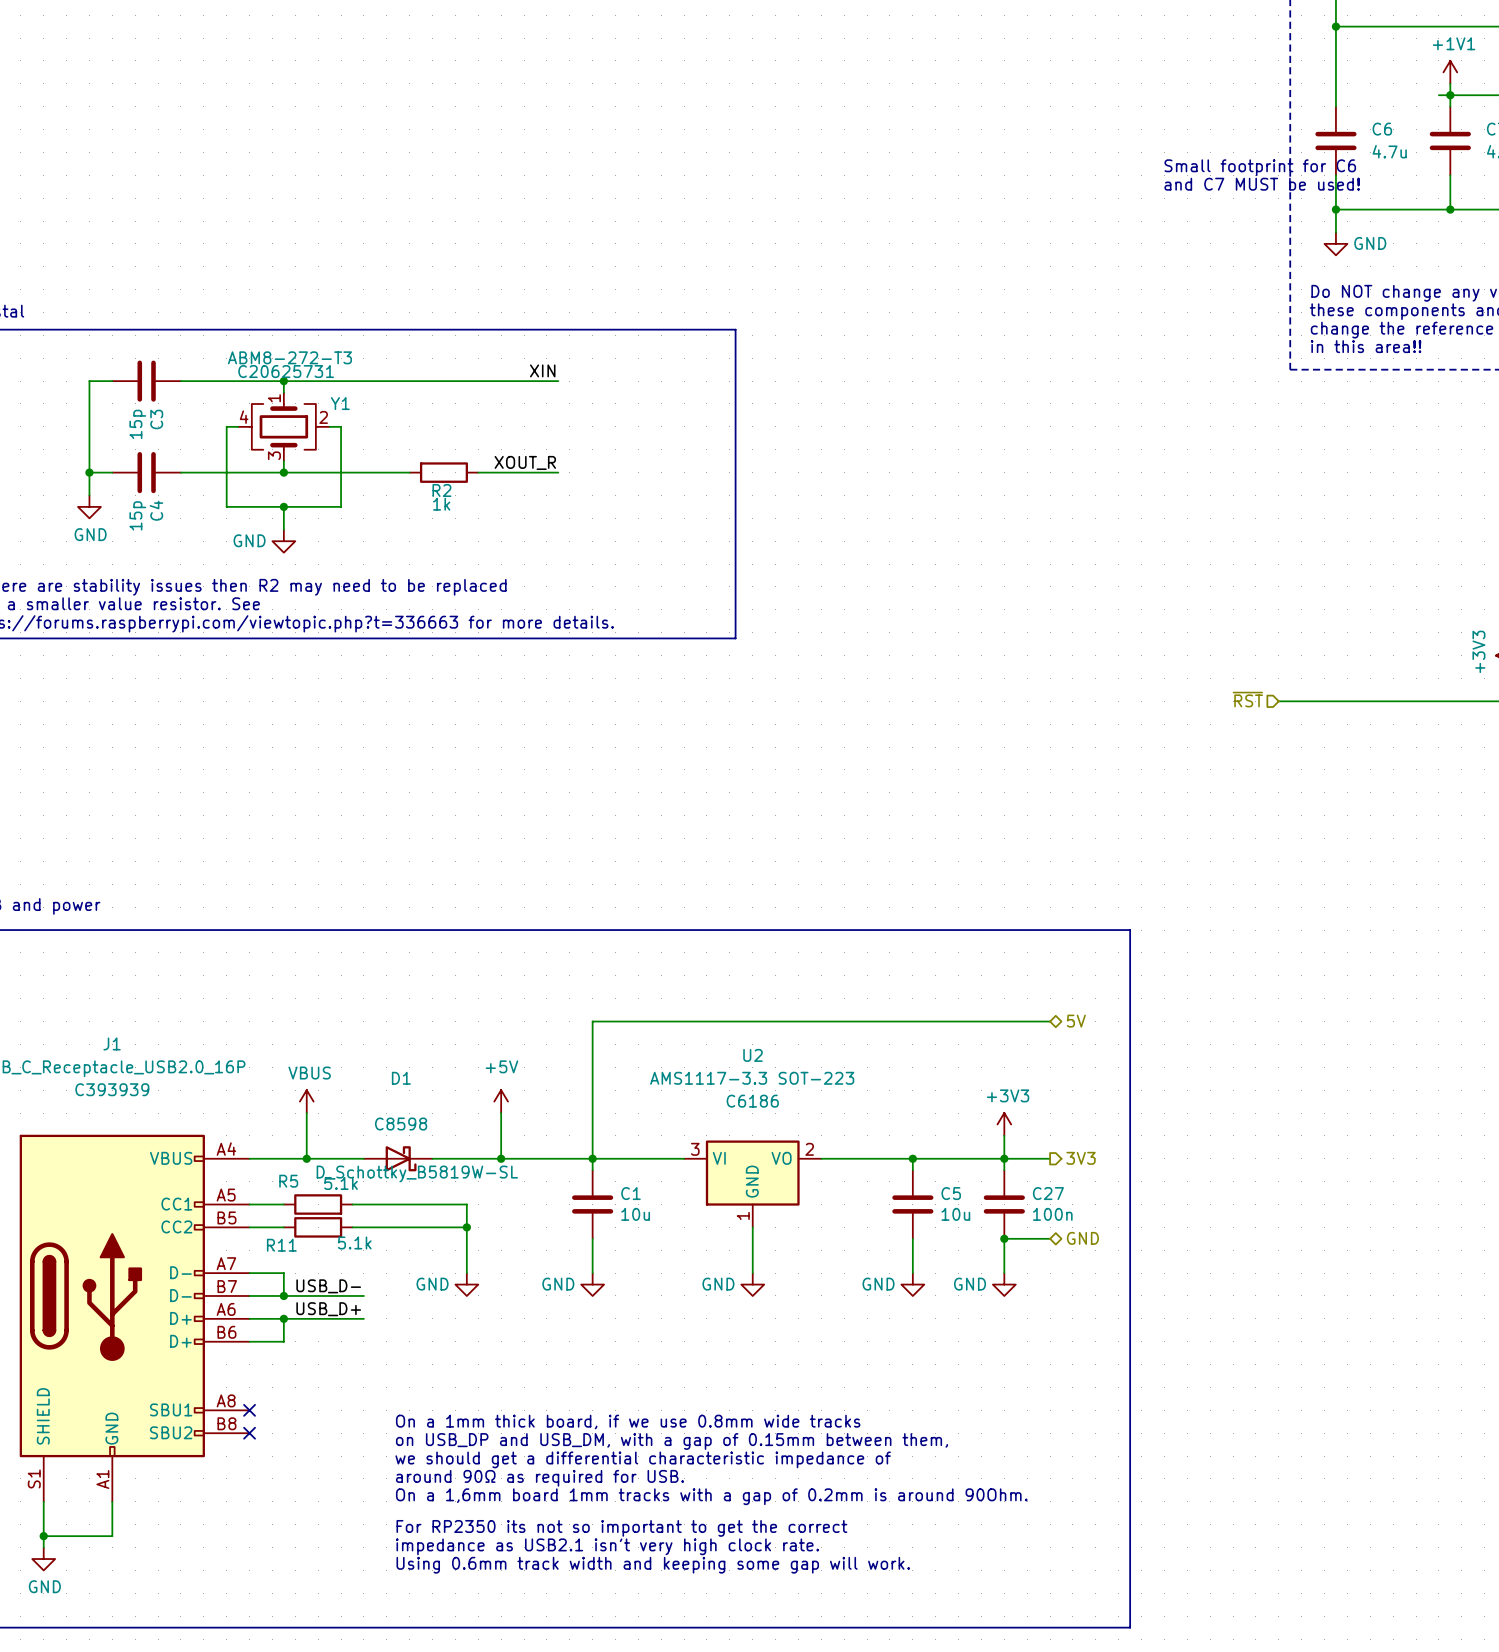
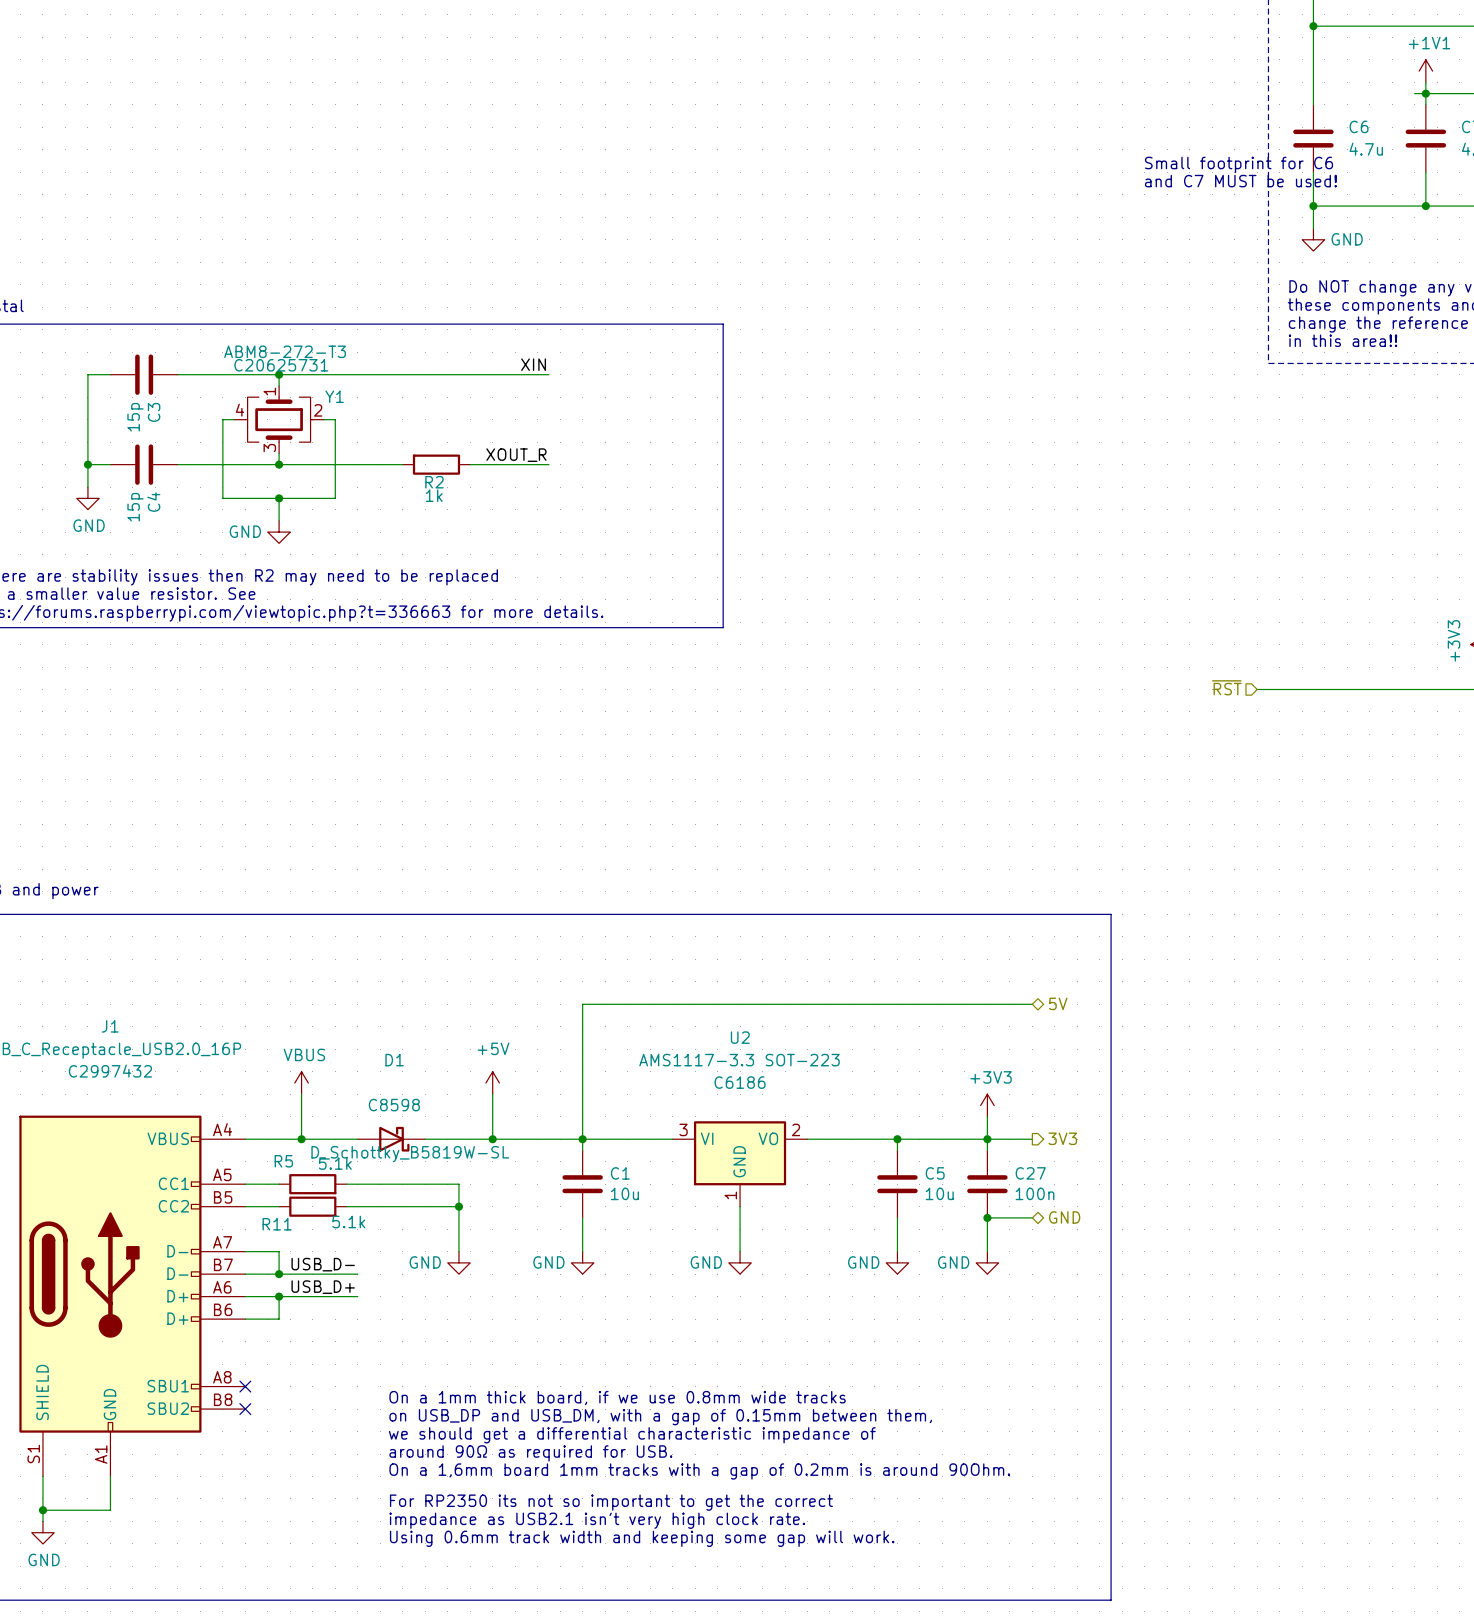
J1 text: C393939 (112, 1089) -> C2997432 (110, 1071)

